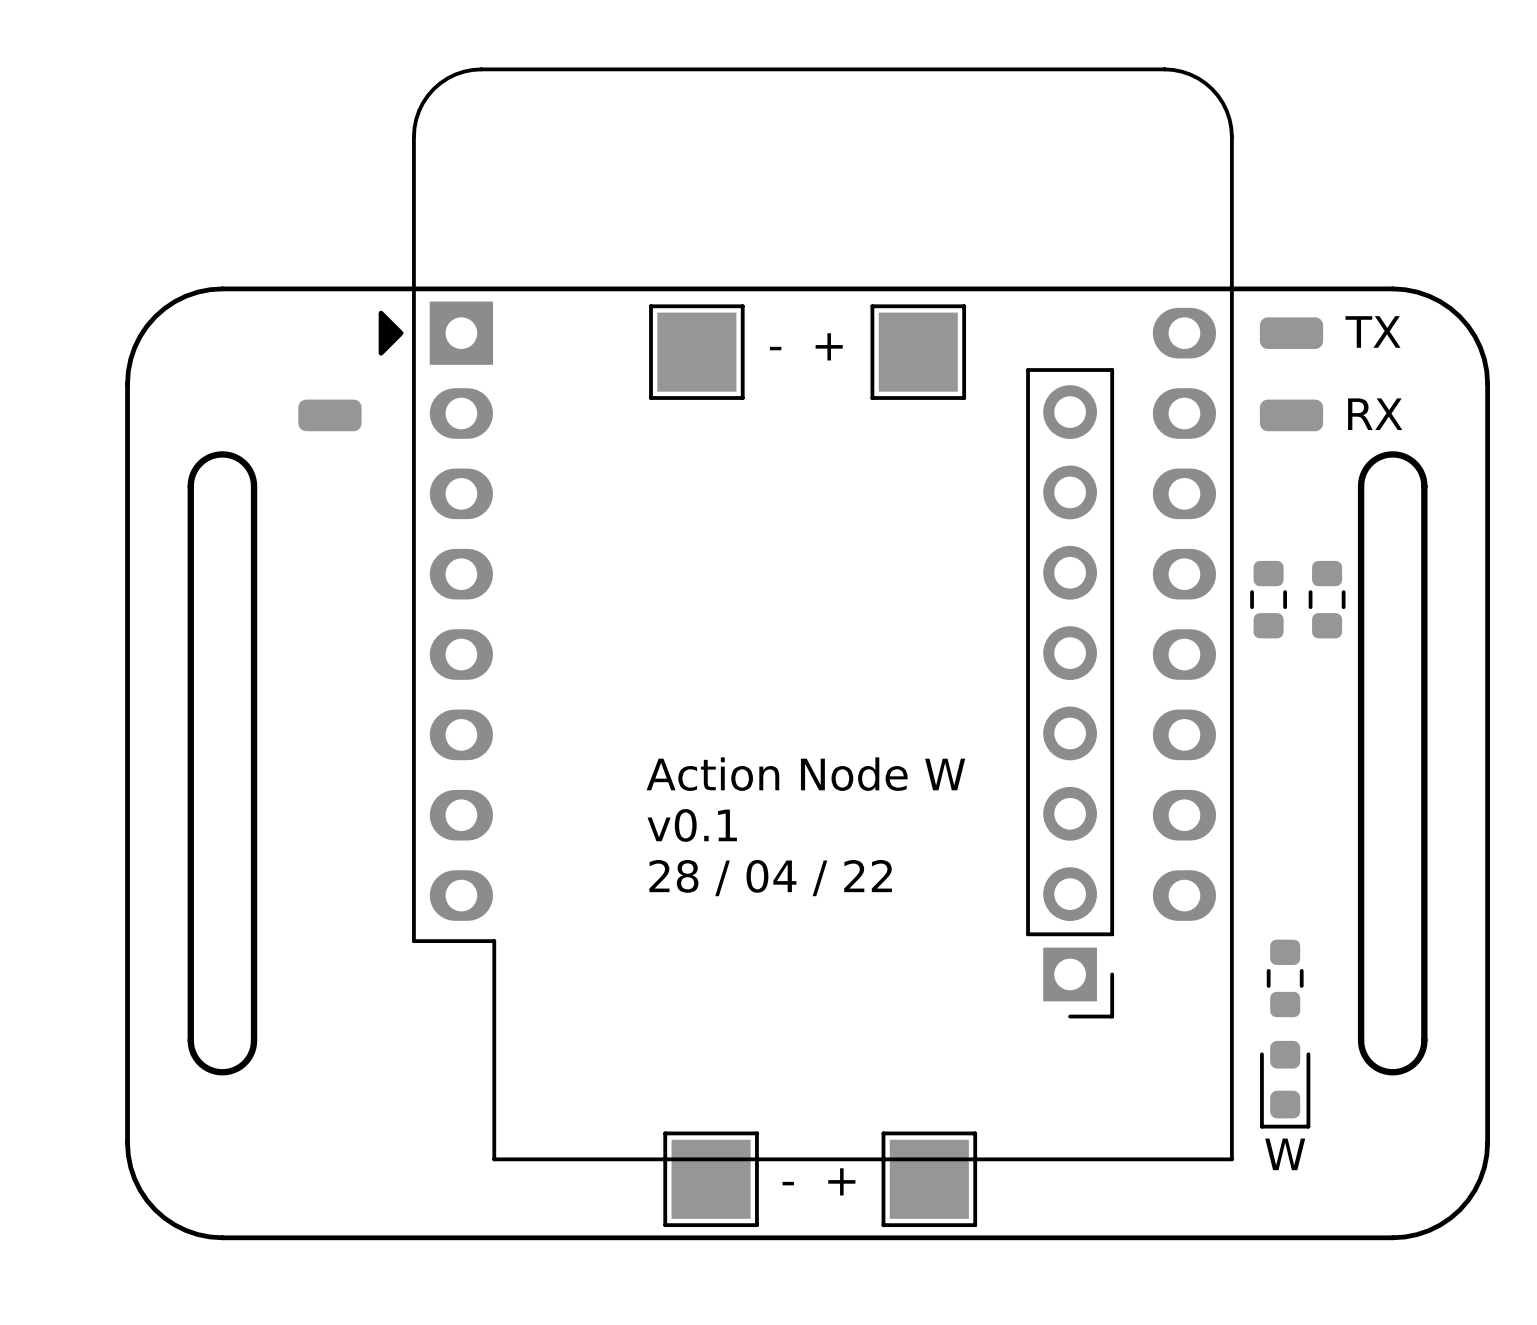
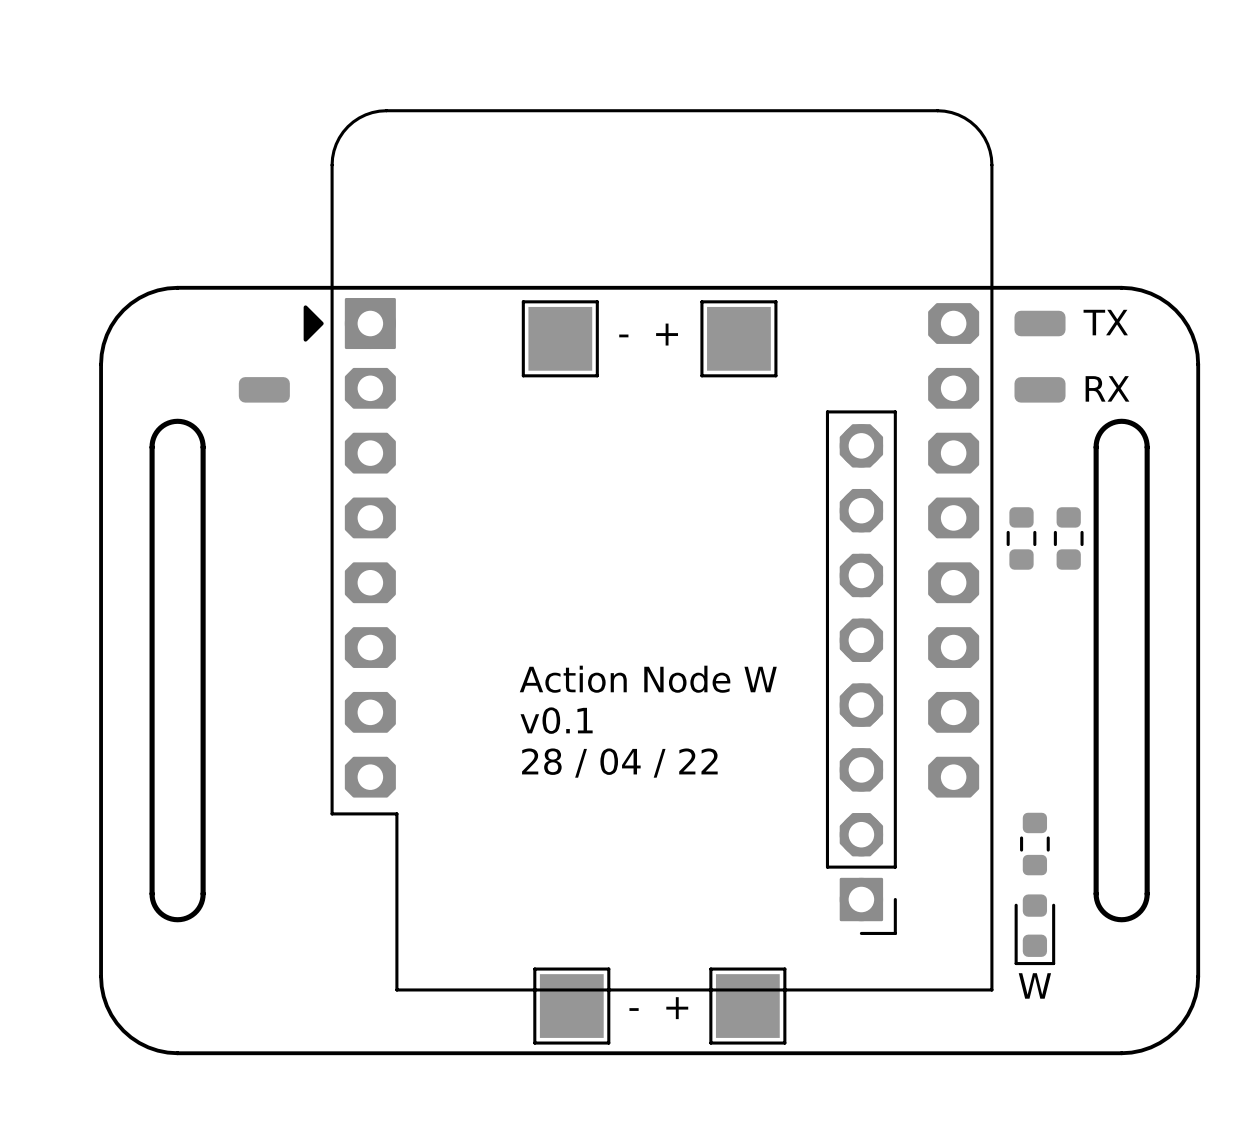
part footprint: [378, 67, 1234, 1162] -> [303, 109, 994, 992]
part: (1070, 693) -> none
part: none -> (861, 672)

